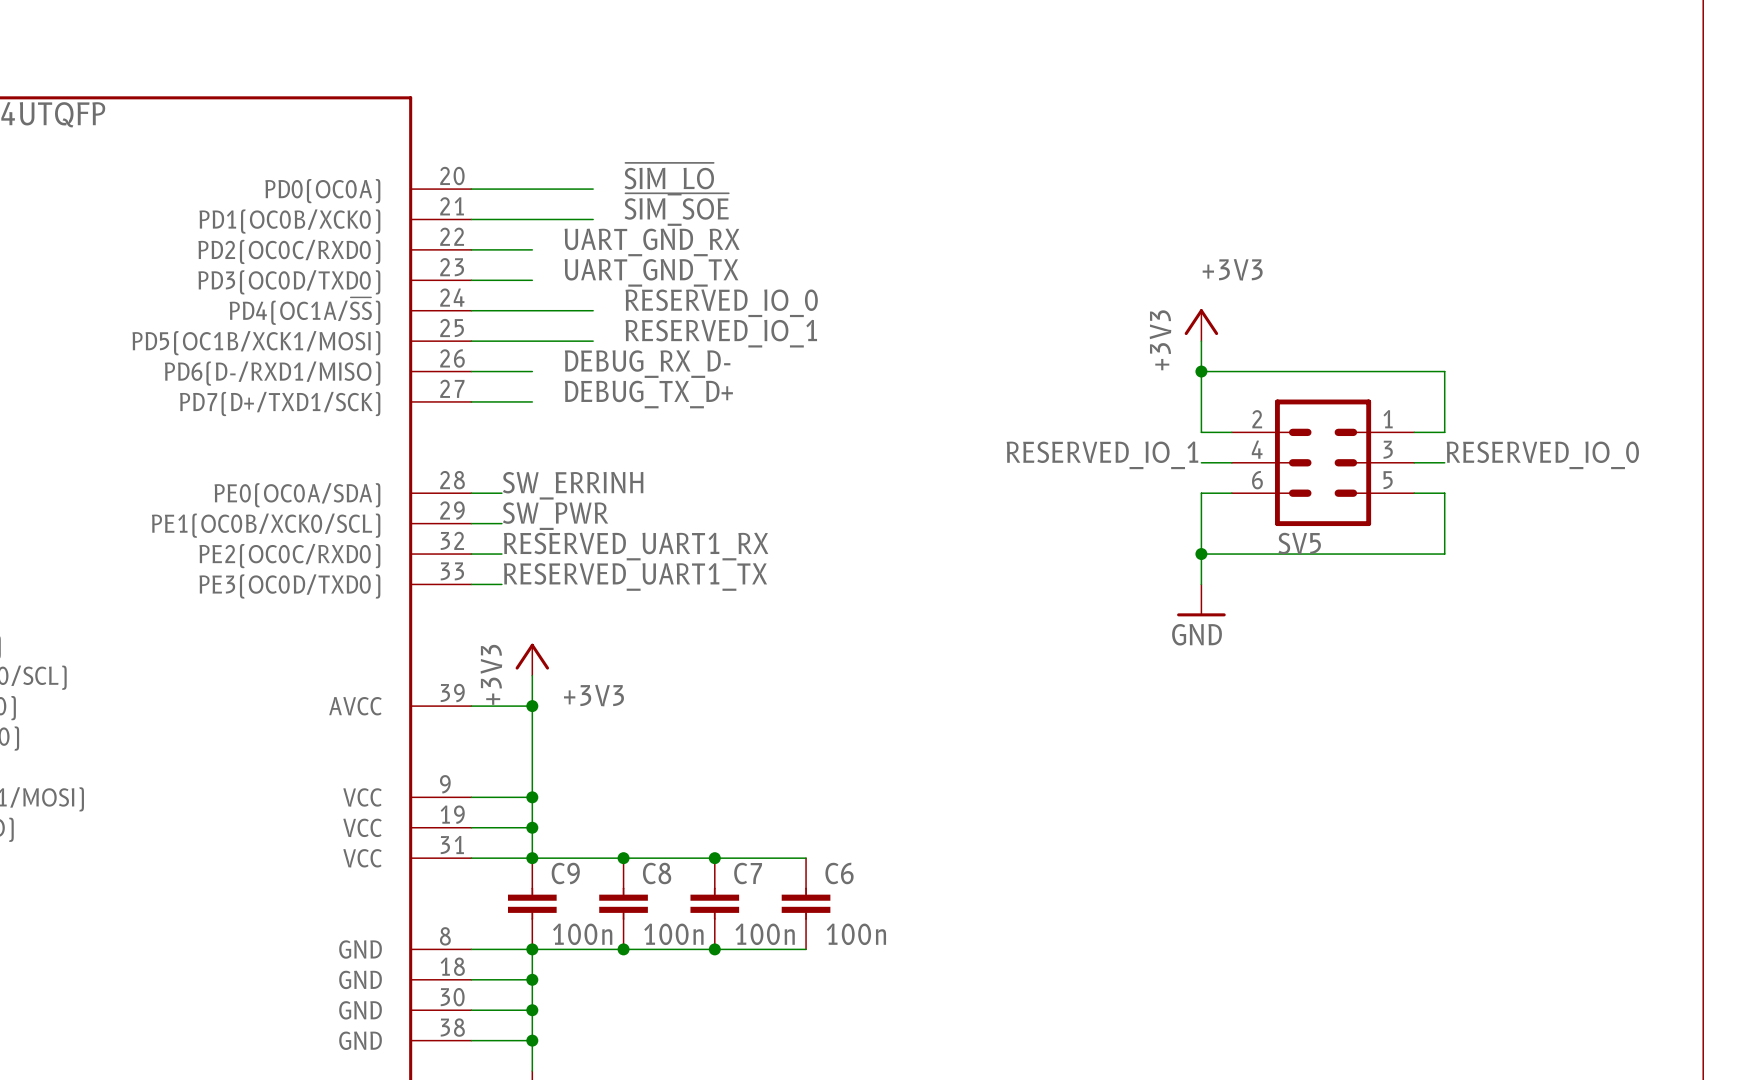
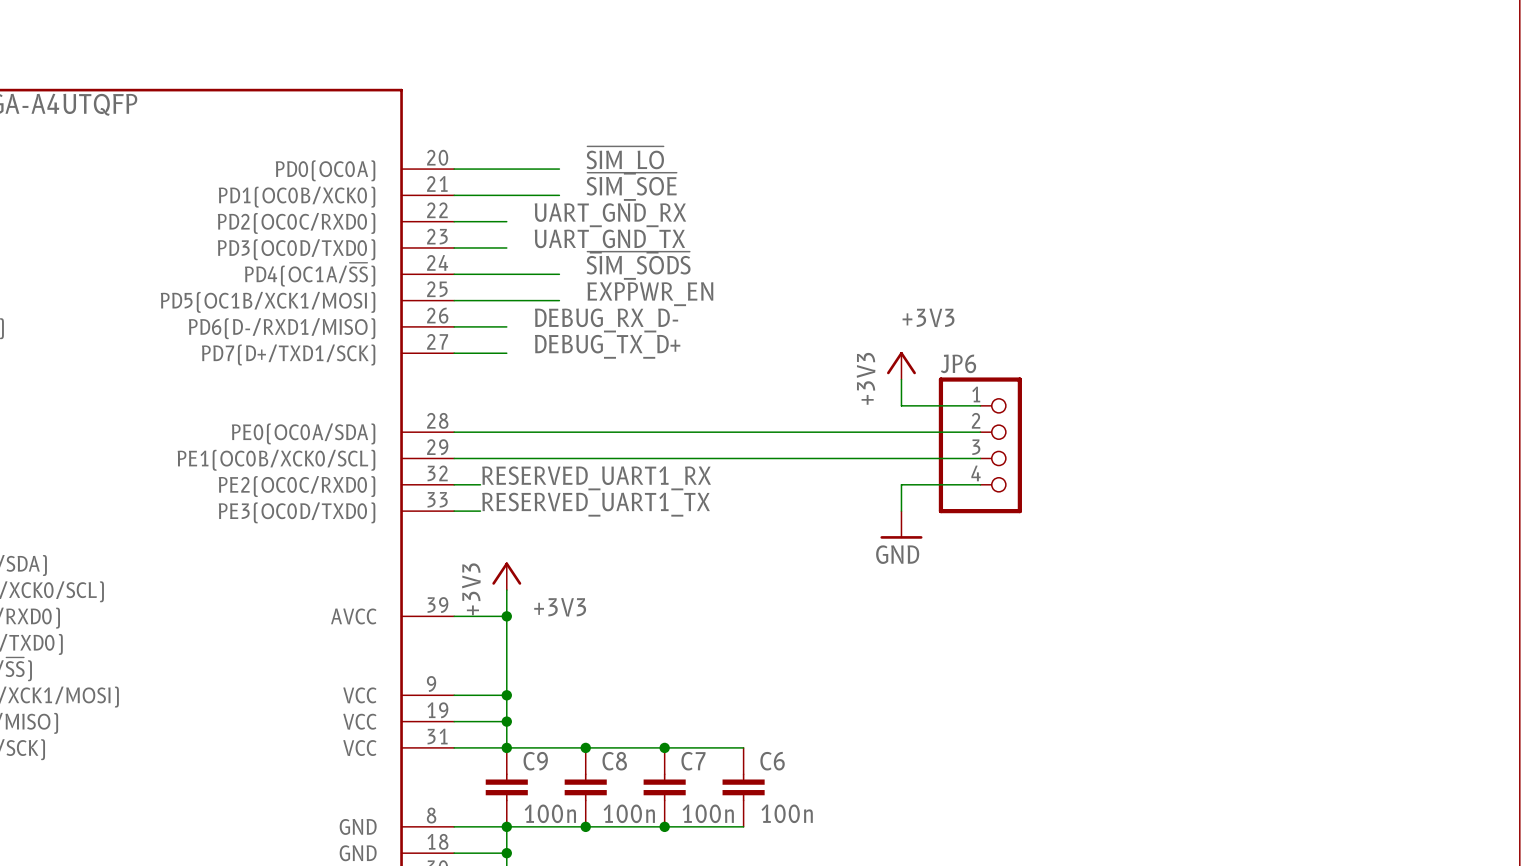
label position: +3V3 (1232, 269) -> +3V3 (928, 317)
label: RESERVED_IO_0 (721, 303) -> ~{SIM_SODS} (638, 265)
power symbol position: +3V3 (1201, 325) -> +3V3 (901, 365)
label: RESERVED_IO_1 (721, 333) -> EXPPWR_EN (650, 294)
wire: (1201, 341) (1201, 432) (1231, 432) -> none
wire: (1201, 371) (1444, 371) (1444, 432) (1414, 432) -> none
junction: (1201, 371) -> none
wire: none -> (901, 379) (901, 405) (980, 405)
label: RESERVED_IO_1 (1102, 455) -> none
label: RESERVED_IO_0 (1542, 455) -> none
wire: (1201, 462) (1231, 462) -> none
SV5: (1323, 462) -> none
wire: (1414, 462) (1444, 462) -> none
label: SW_ERRINH (573, 485) -> none
wire: none -> (480, 432) (980, 432)
wire: (1231, 493) (1201, 493) (1201, 584) -> none
wire: (1414, 493) (1444, 493) (1444, 554) (1201, 554) -> none
JP6: none -> (980, 445)
label: SW_PWR (555, 516) -> none
wire: none -> (480, 458) (980, 458)
wire: none -> (980, 484) (901, 484) (901, 511)
junction: (1201, 554) -> none
power symbol position: GND (1201, 600) -> GND (901, 524)

